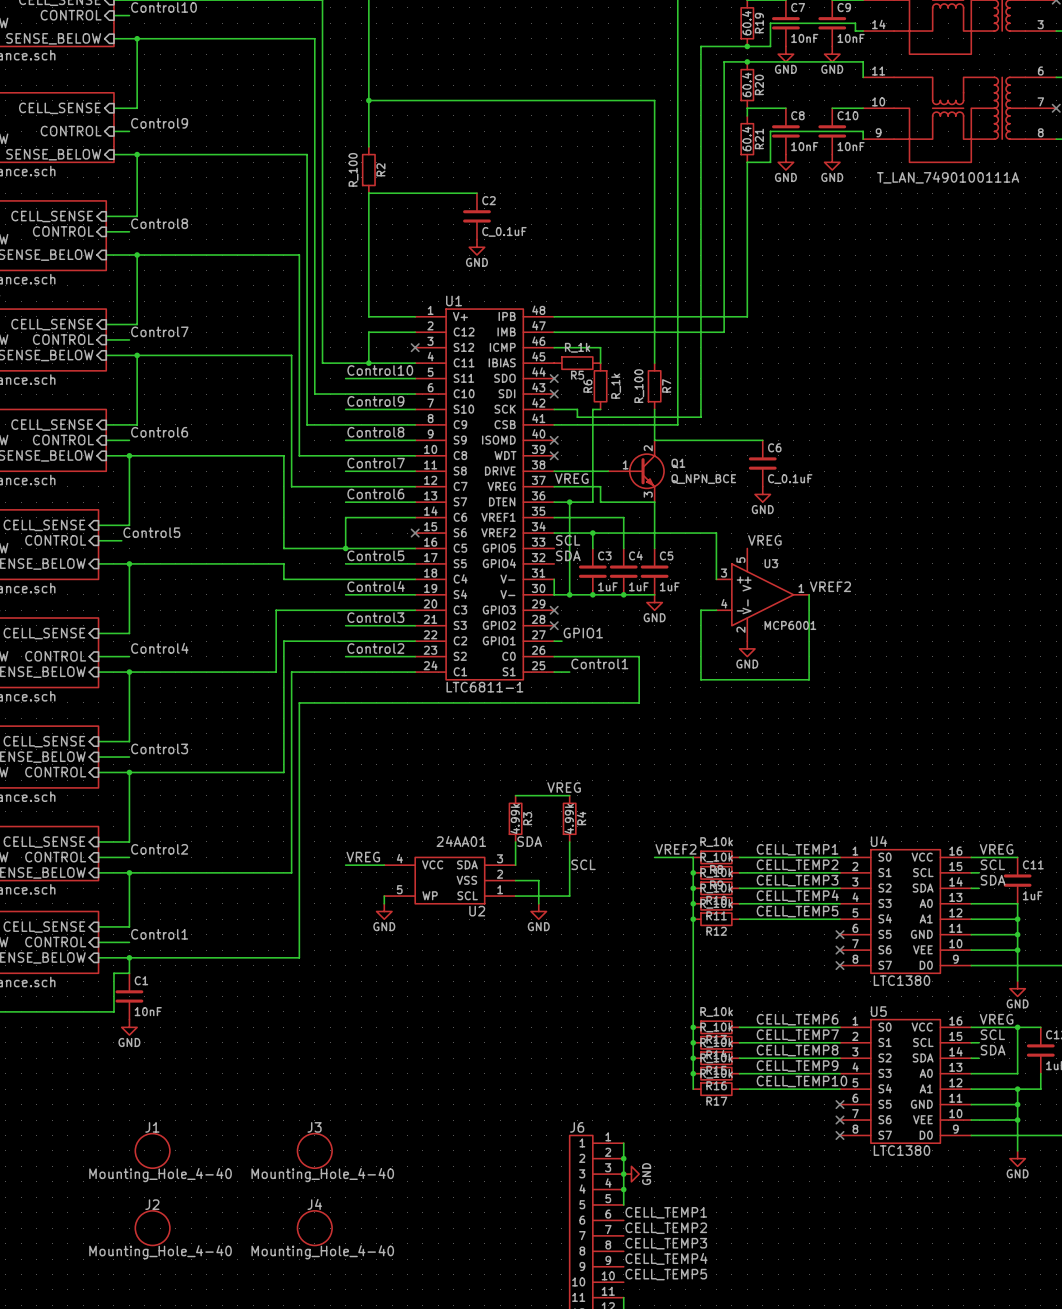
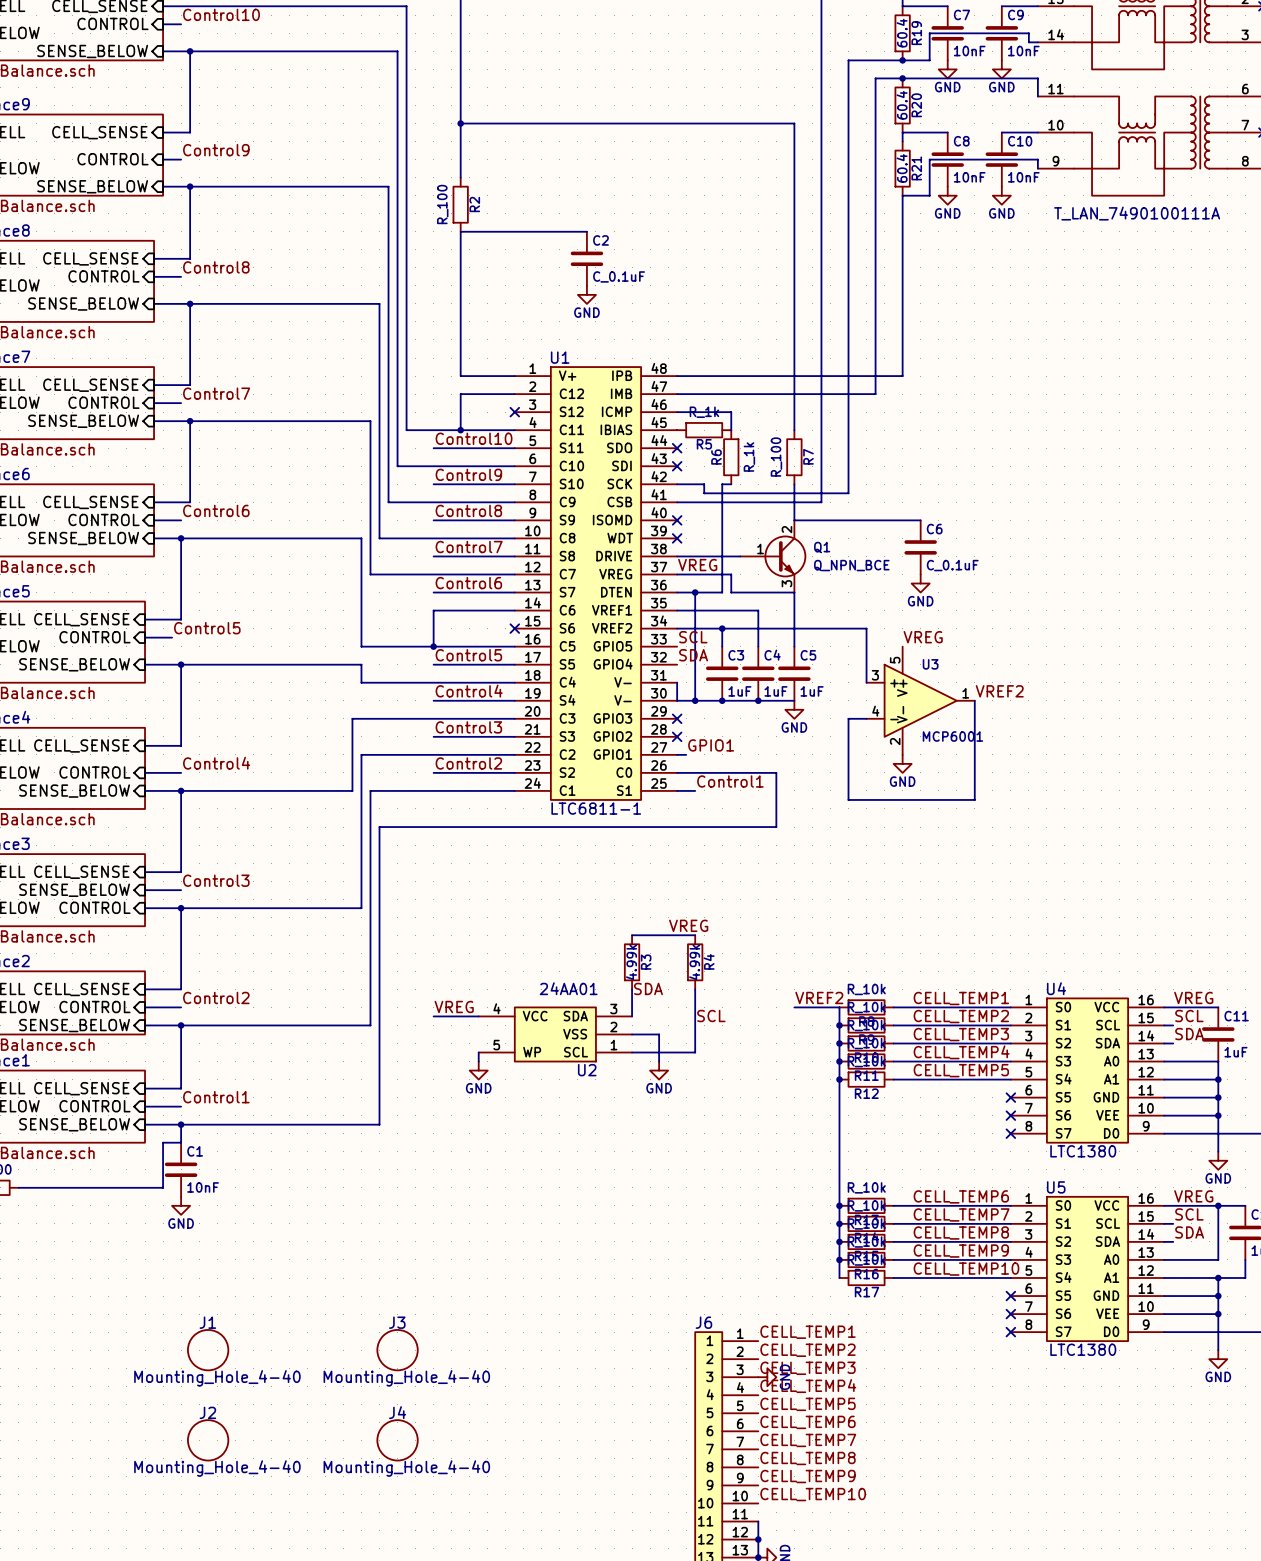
label: none -> CELL_TEMP1 (807, 1332)
wire: (623, 1143) (623, 1204) -> none
label: none -> CELL_TEMP2 (807, 1350)
junction: (623, 1158) -> none
label: none -> CELL_TEMP3 (807, 1368)
junction: (623, 1174) -> none
label: none -> CELL_TEMP4 (808, 1386)
junction: (623, 1189) -> none
label: none -> CELL_TEMP5 (807, 1404)
label: CELL_TEMP1 (666, 1212) -> CELL_TEMP6 (807, 1422)
label: CELL_TEMP2 (666, 1228) -> CELL_TEMP7 (808, 1440)
label: CELL_TEMP3 (666, 1243) -> CELL_TEMP8 (807, 1458)
label: CELL_TEMP4 (666, 1258) -> CELL_TEMP9 (807, 1476)
label: CELL_TEMP5 (666, 1274) -> CELL_TEMP10 (813, 1494)

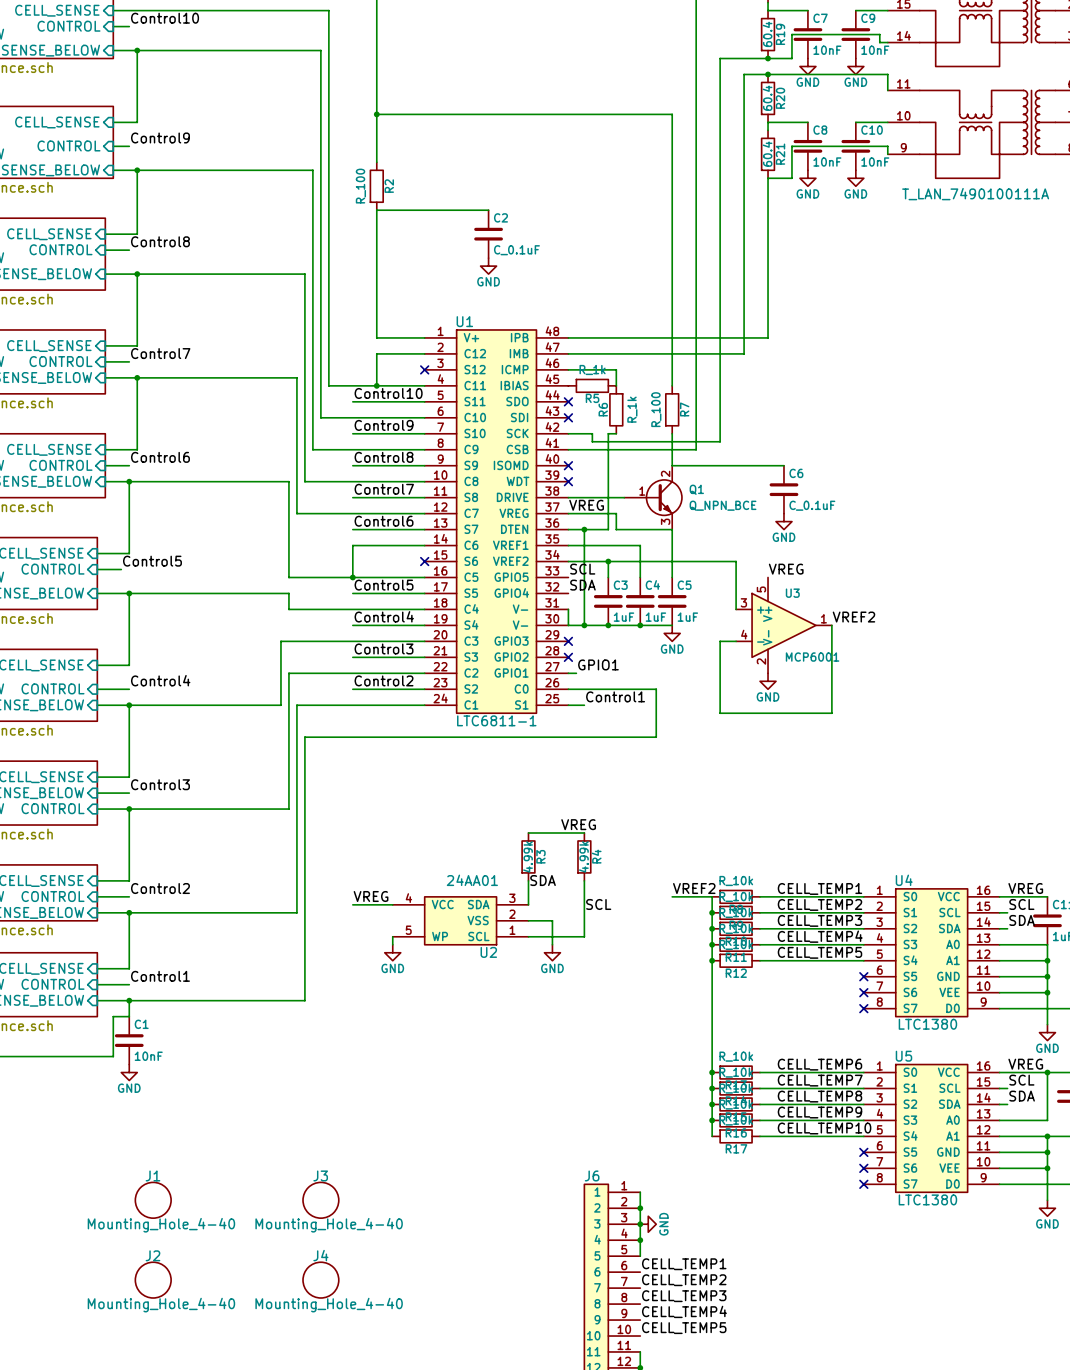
label: CELL_TEMP1 (807, 1332) -> none
wire: none -> (640, 1192) (640, 1256)
label: CELL_TEMP2 (807, 1350) -> none
junction: none -> (640, 1208)
label: CELL_TEMP3 (807, 1368) -> none
junction: none -> (640, 1224)
label: CELL_TEMP4 (808, 1386) -> none
junction: none -> (640, 1240)
label: CELL_TEMP5 (807, 1404) -> none
label: CELL_TEMP6 (807, 1422) -> CELL_TEMP1 (684, 1264)
label: CELL_TEMP7 (808, 1440) -> CELL_TEMP2 (684, 1280)
label: CELL_TEMP8 (807, 1458) -> CELL_TEMP3 (684, 1296)
label: CELL_TEMP9 (807, 1476) -> CELL_TEMP4 (684, 1311)
label: CELL_TEMP10 (813, 1494) -> CELL_TEMP5 (684, 1328)

